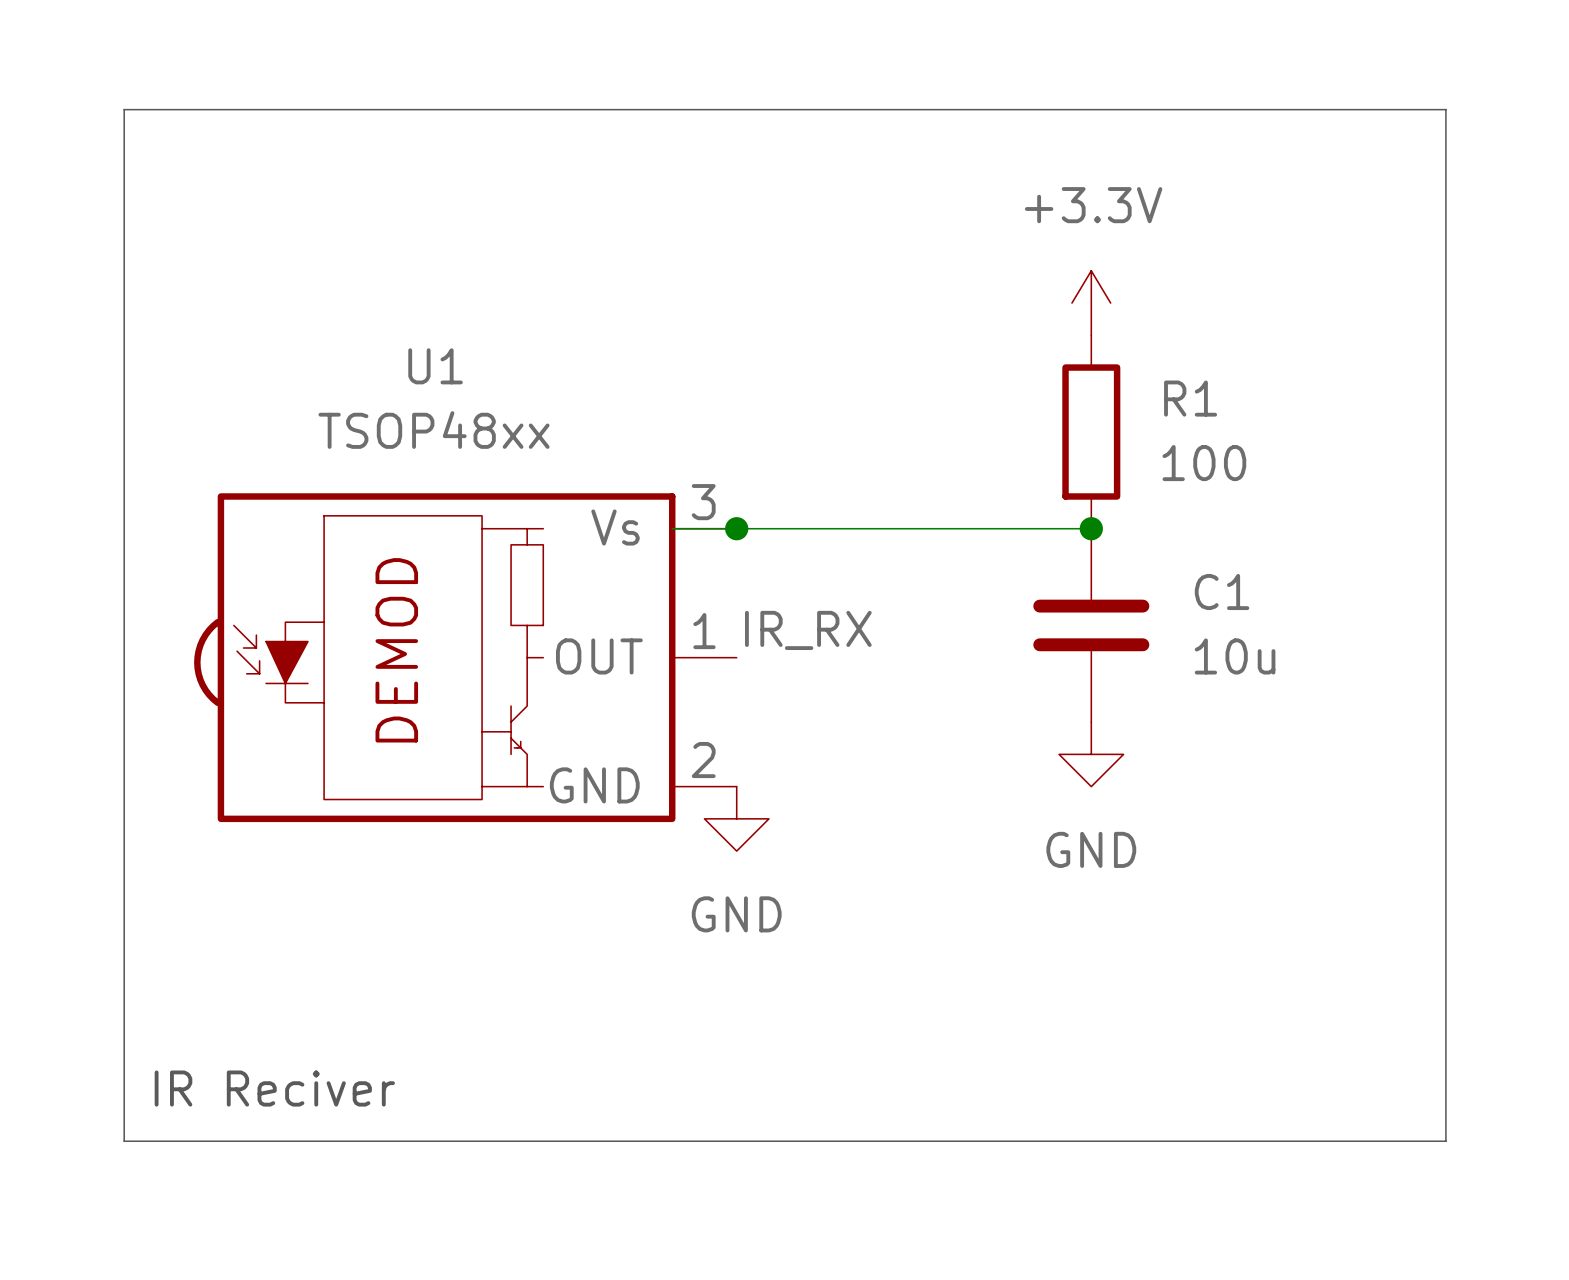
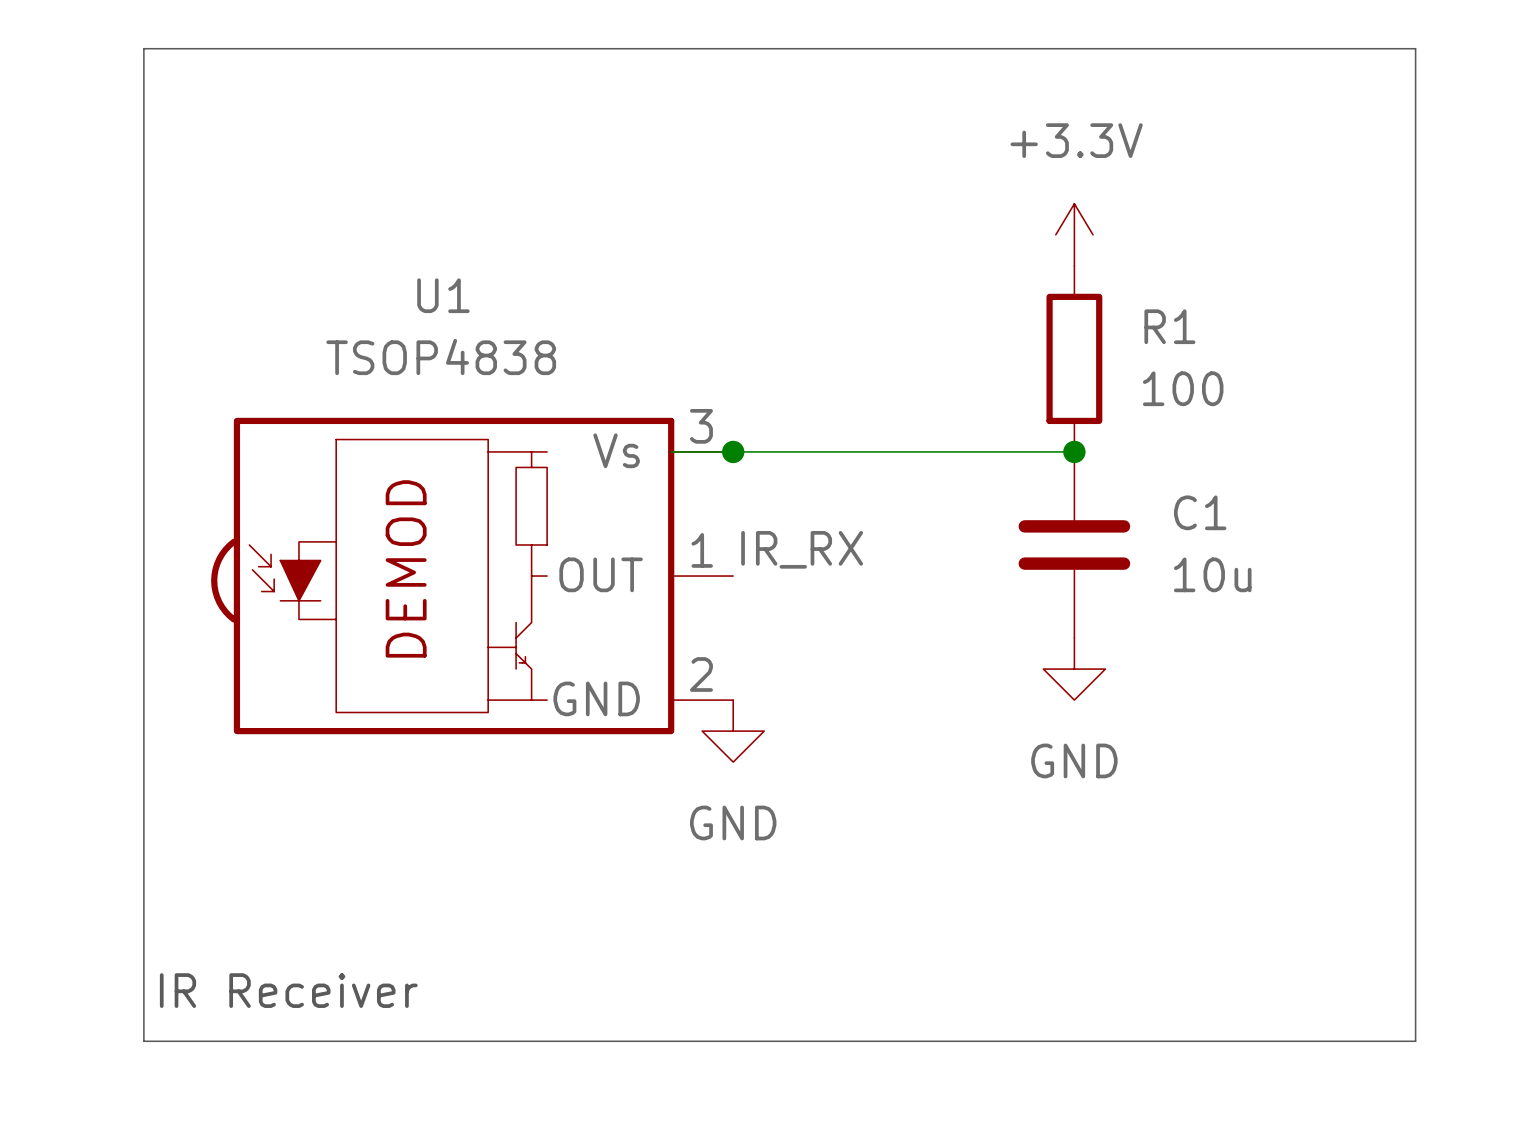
U1 value: TSOP48xx (434, 430) -> TSOP4838 (441, 357)
text: IR Reciver (274, 1088) -> IR Receiver (288, 990)

